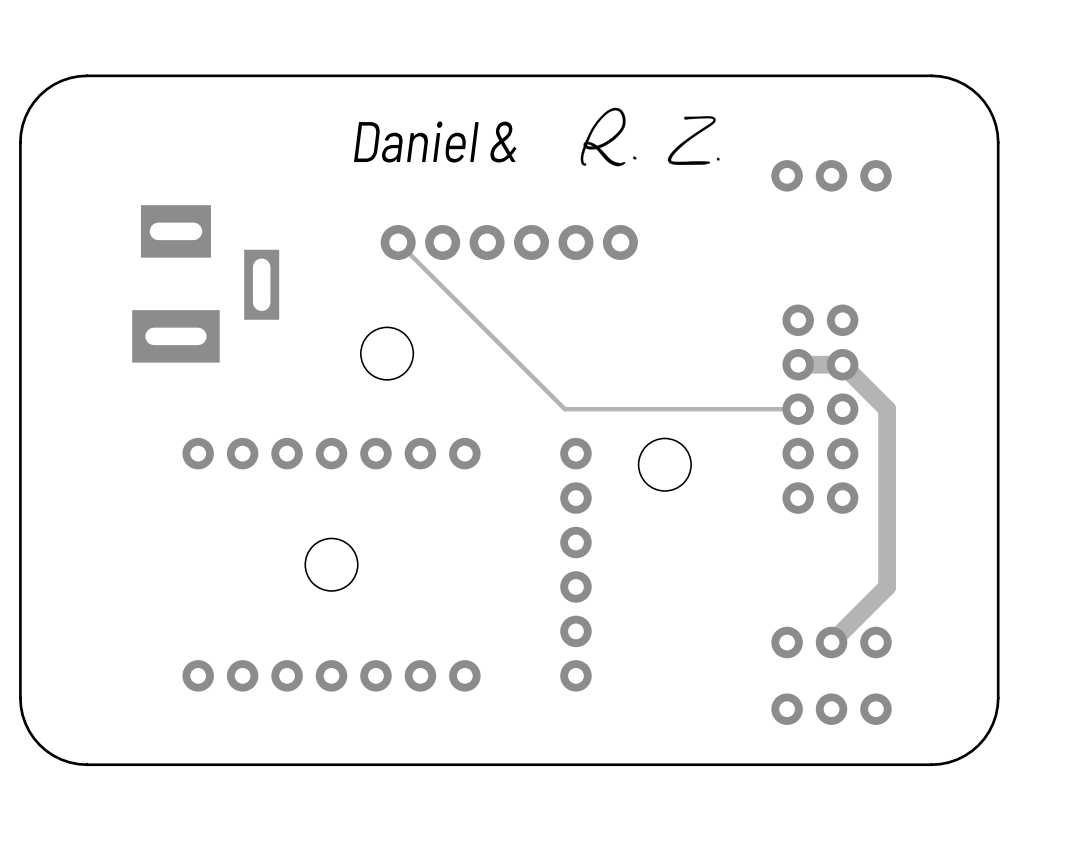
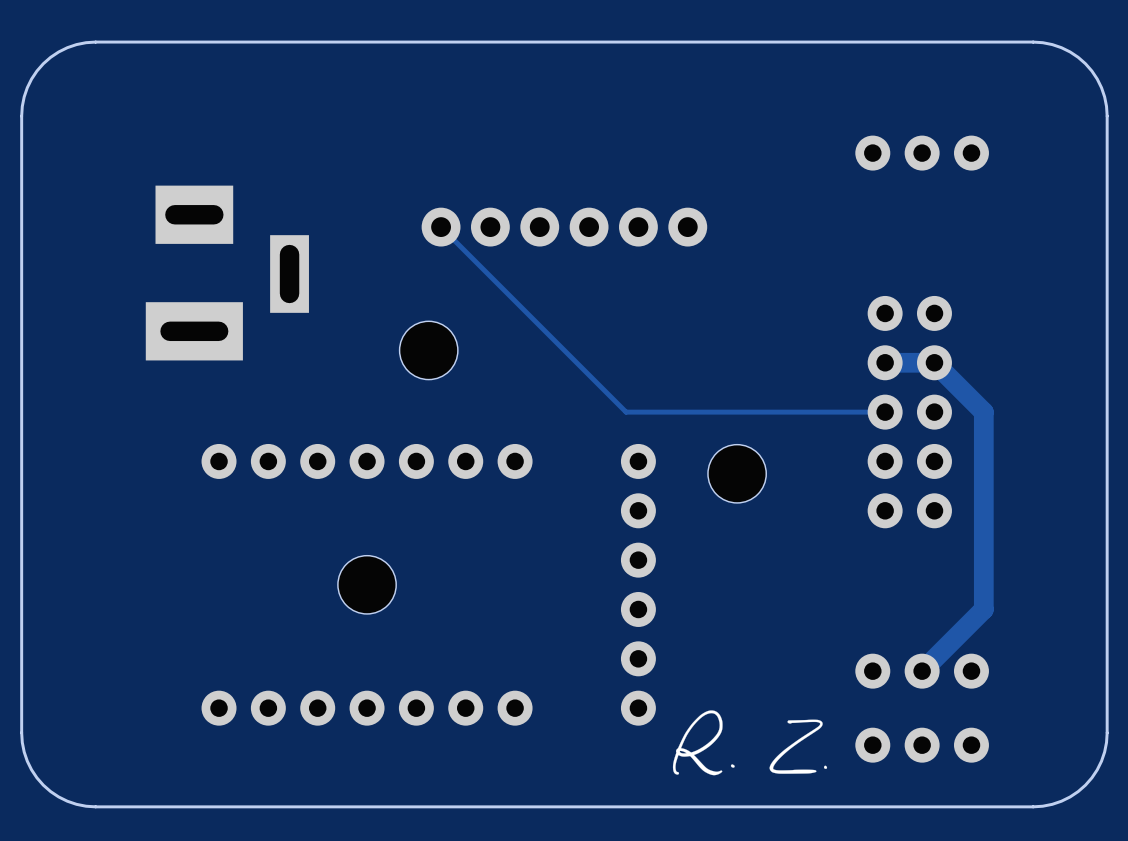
drawing: [580, 107, 720, 167] -> none
text: Daniel & (435, 142) -> none
drawing: none -> [672, 710, 828, 776]

